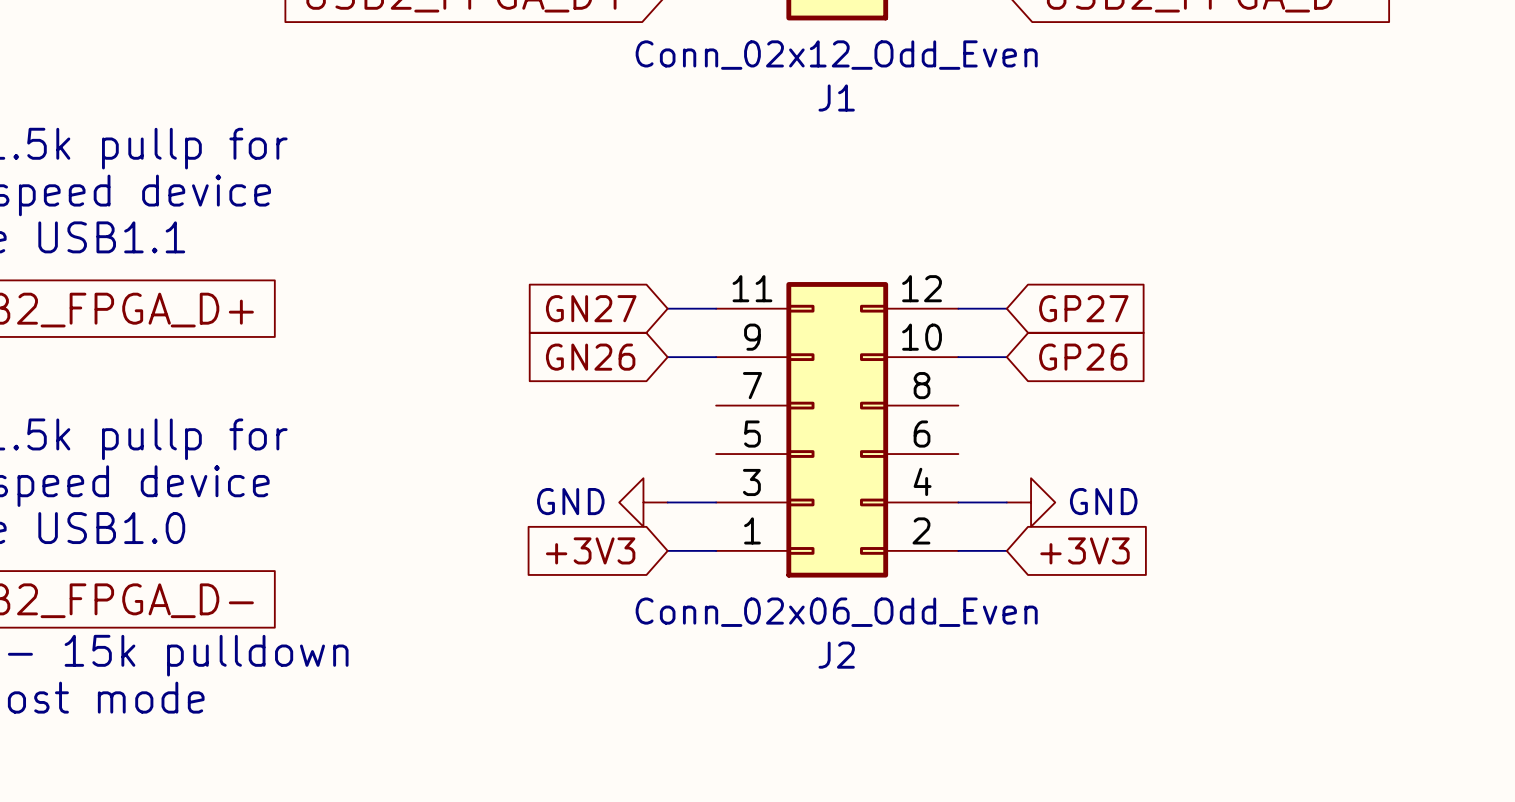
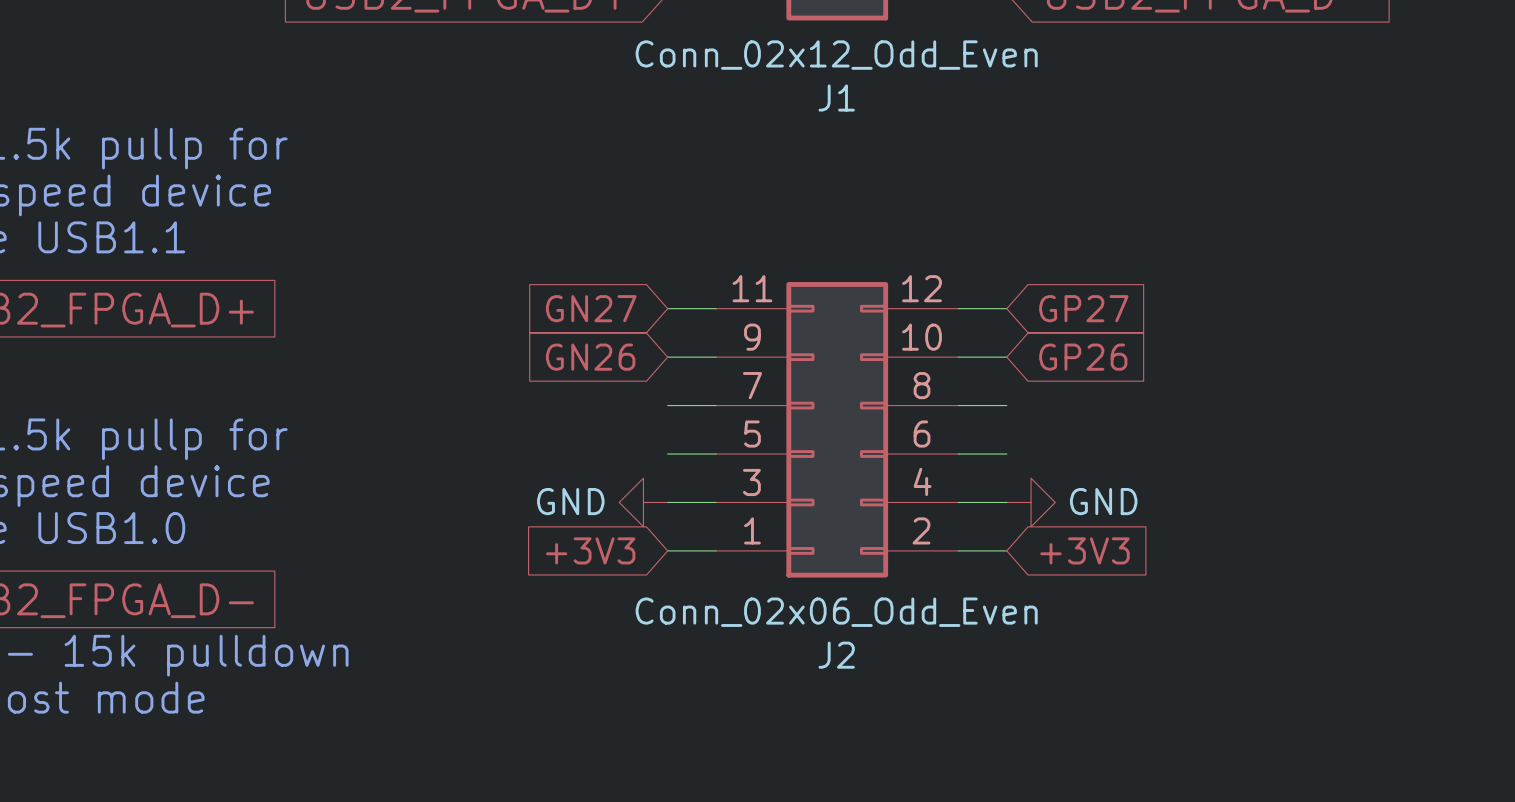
wire: none -> (667, 405) (716, 405)
wire: none -> (958, 405) (1006, 405)
wire: none -> (667, 454) (716, 454)
wire: none -> (958, 454) (1006, 454)

